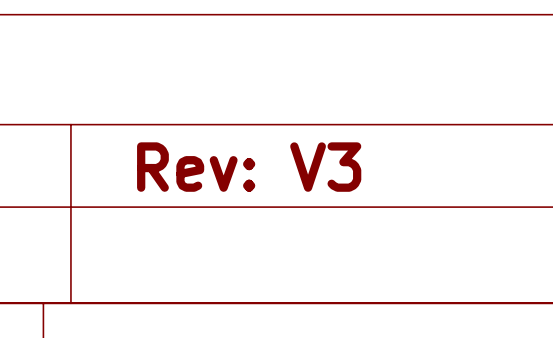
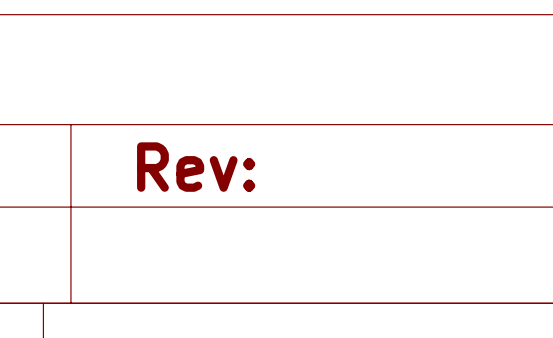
title block: Rev: V3 (249, 167) -> Rev: (196, 167)

